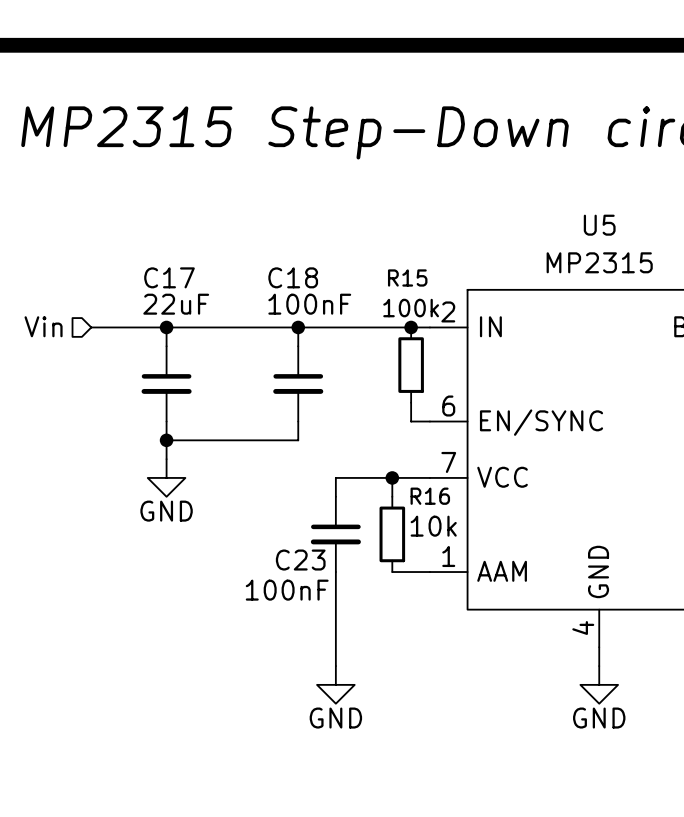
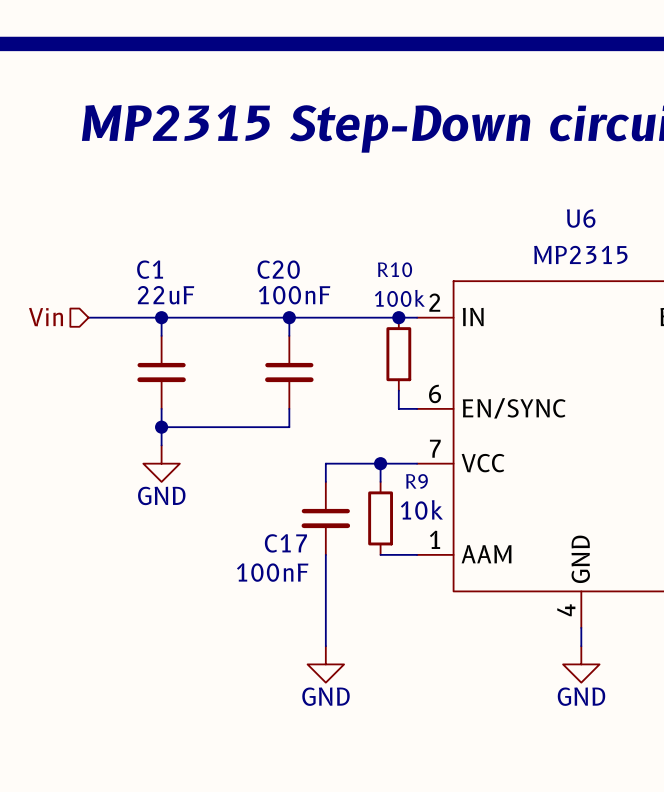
U5 name: U5 (599, 225) -> U6 (581, 218)
C17 name: C17 (169, 277) -> C1 (150, 269)
C18 name: C18 (293, 277) -> C20 (278, 269)
R15 name: R15 (407, 277) -> R10 (395, 269)
R16 name: R16 (430, 496) -> R9 (416, 481)
C23 name: C23 (300, 560) -> C17 (285, 543)

